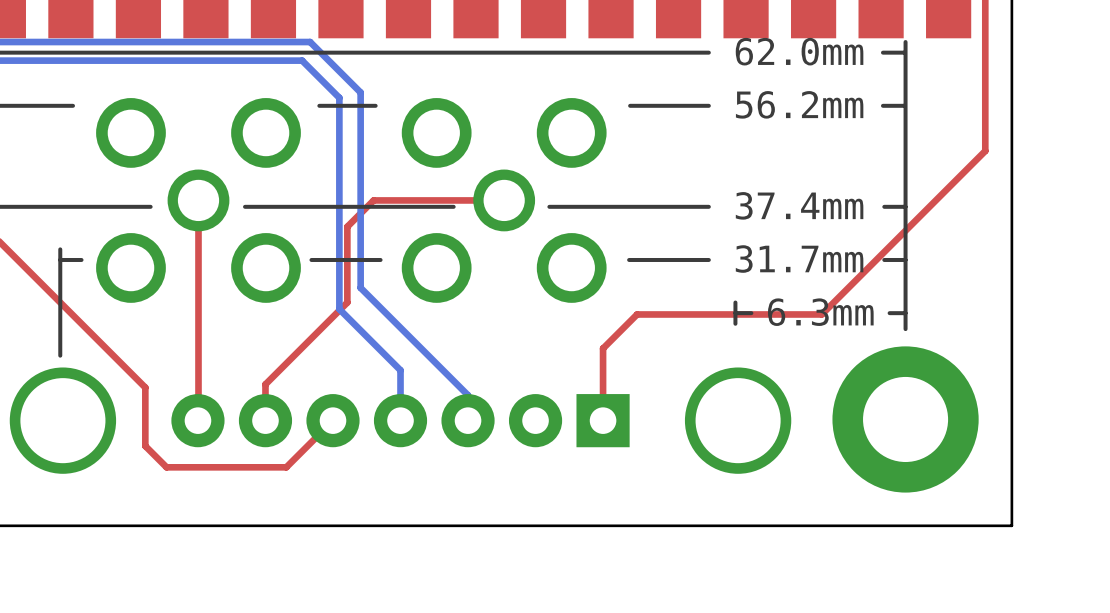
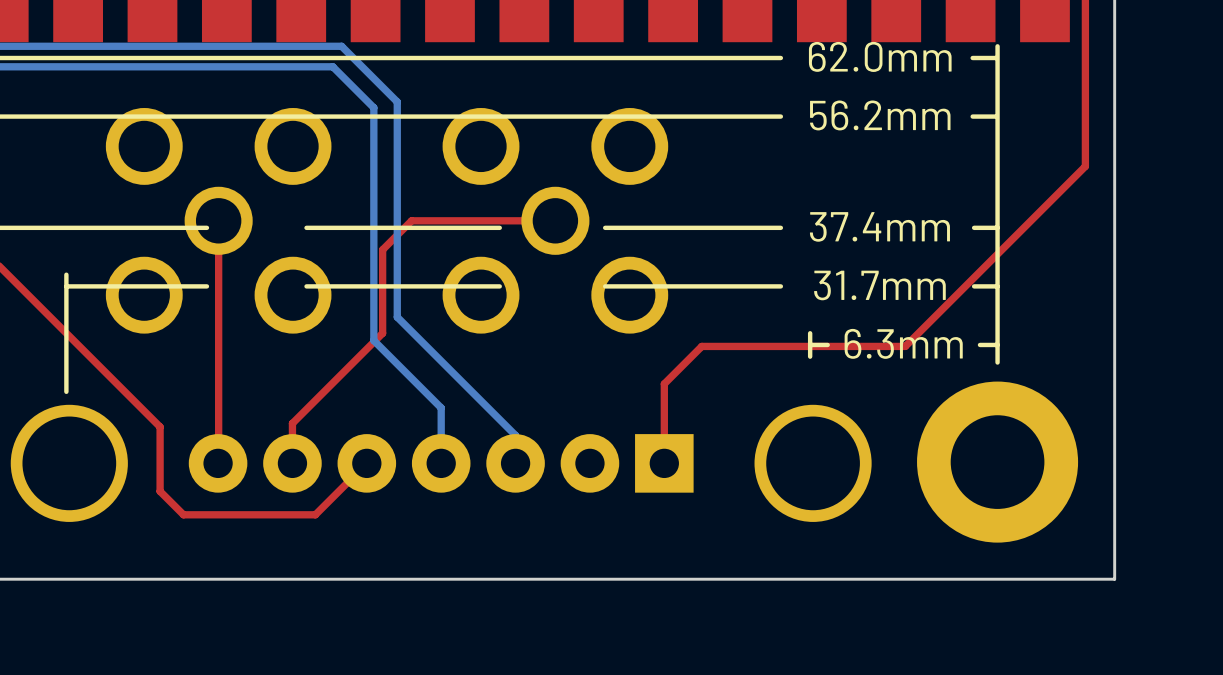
line: none -> (351, 116) (80, 116)
line: none -> (694, 116) (413, 116)
line: none -> (206, 227) (165, 227)
line: (278, 206) (245, 206) -> (343, 286) (306, 286)
line: none -> (206, 286) (89, 286)
line: none -> (499, 286) (419, 286)
line: none -> (693, 286) (605, 286)

